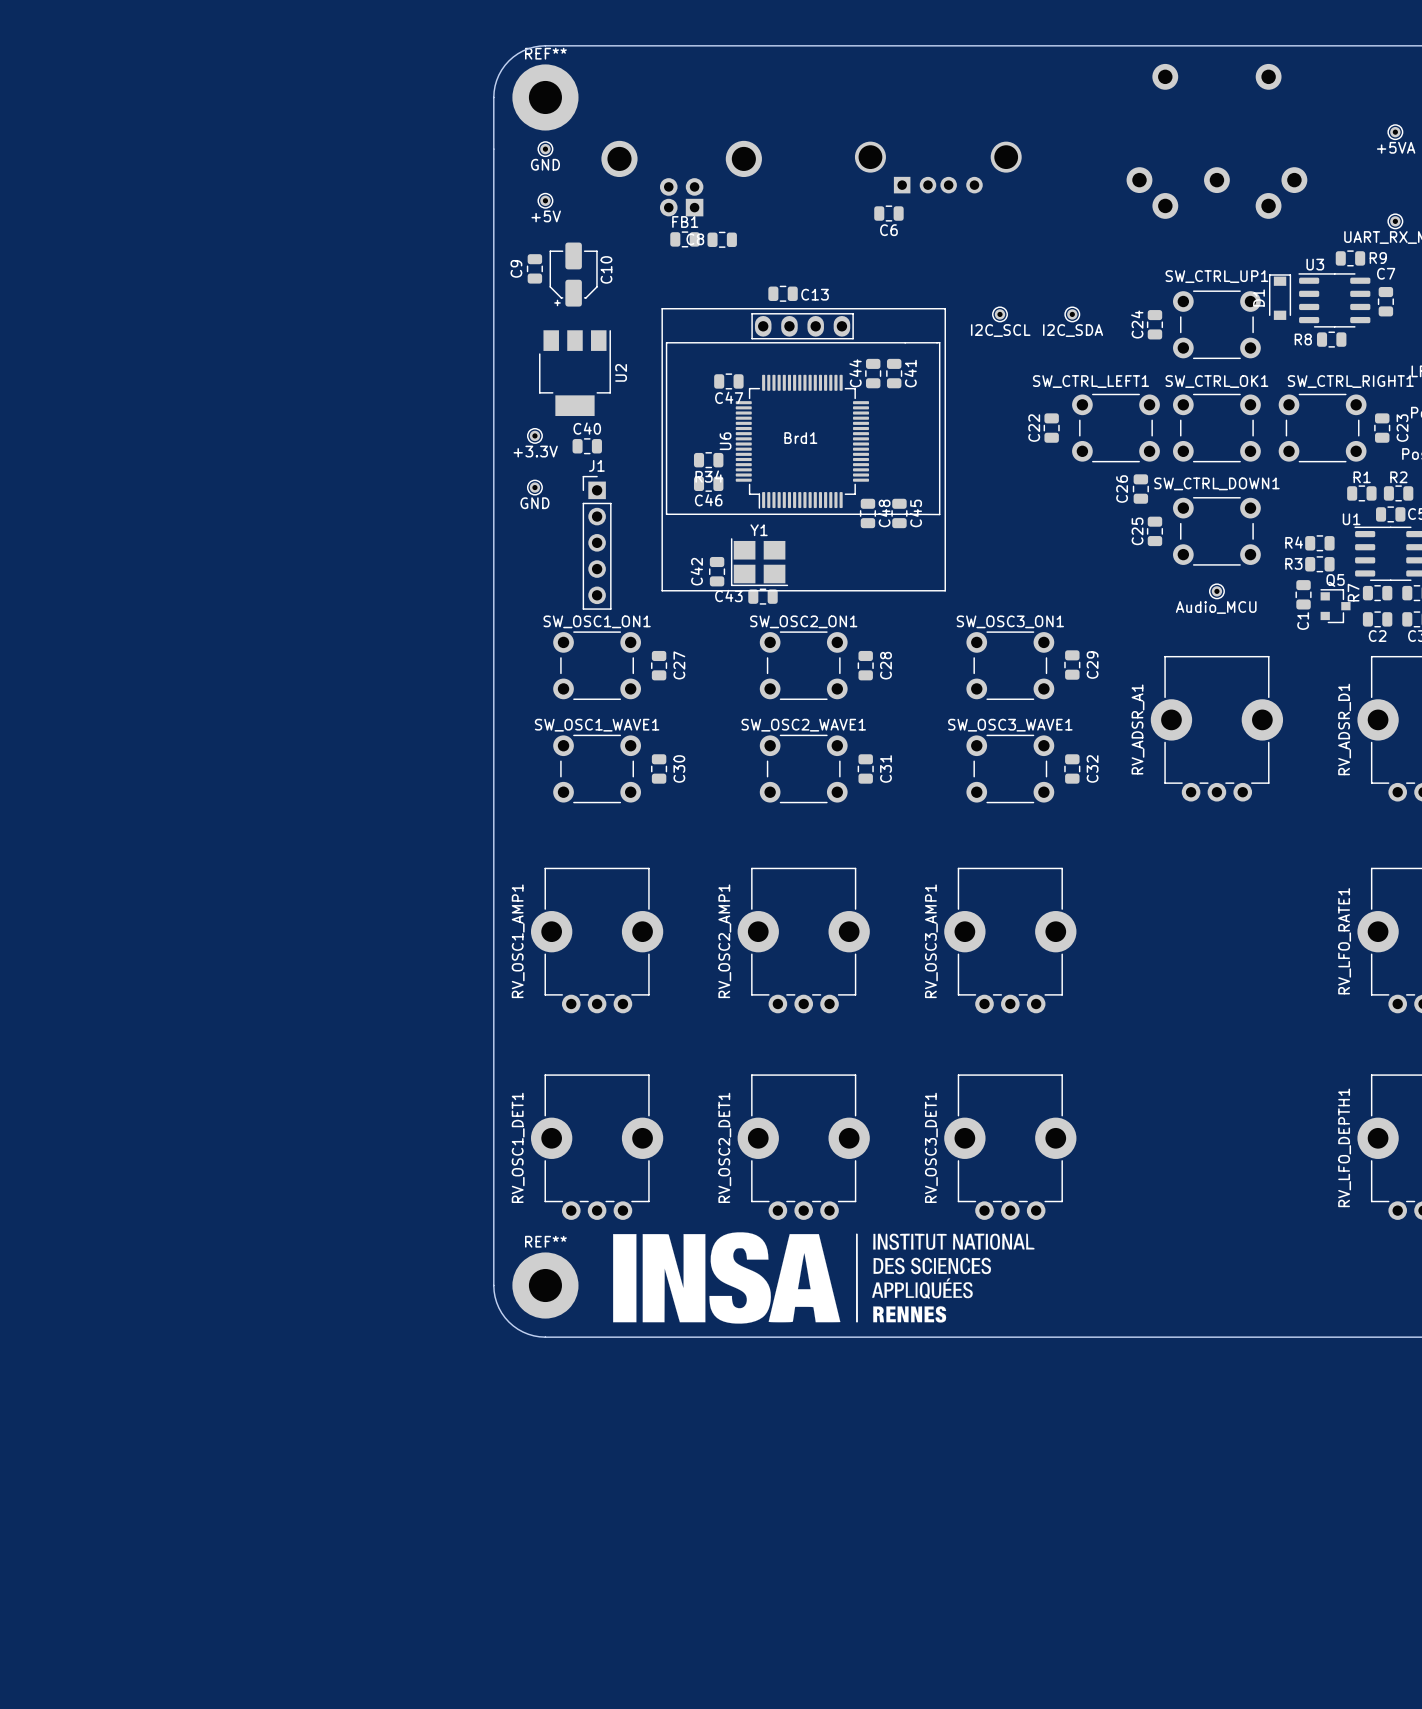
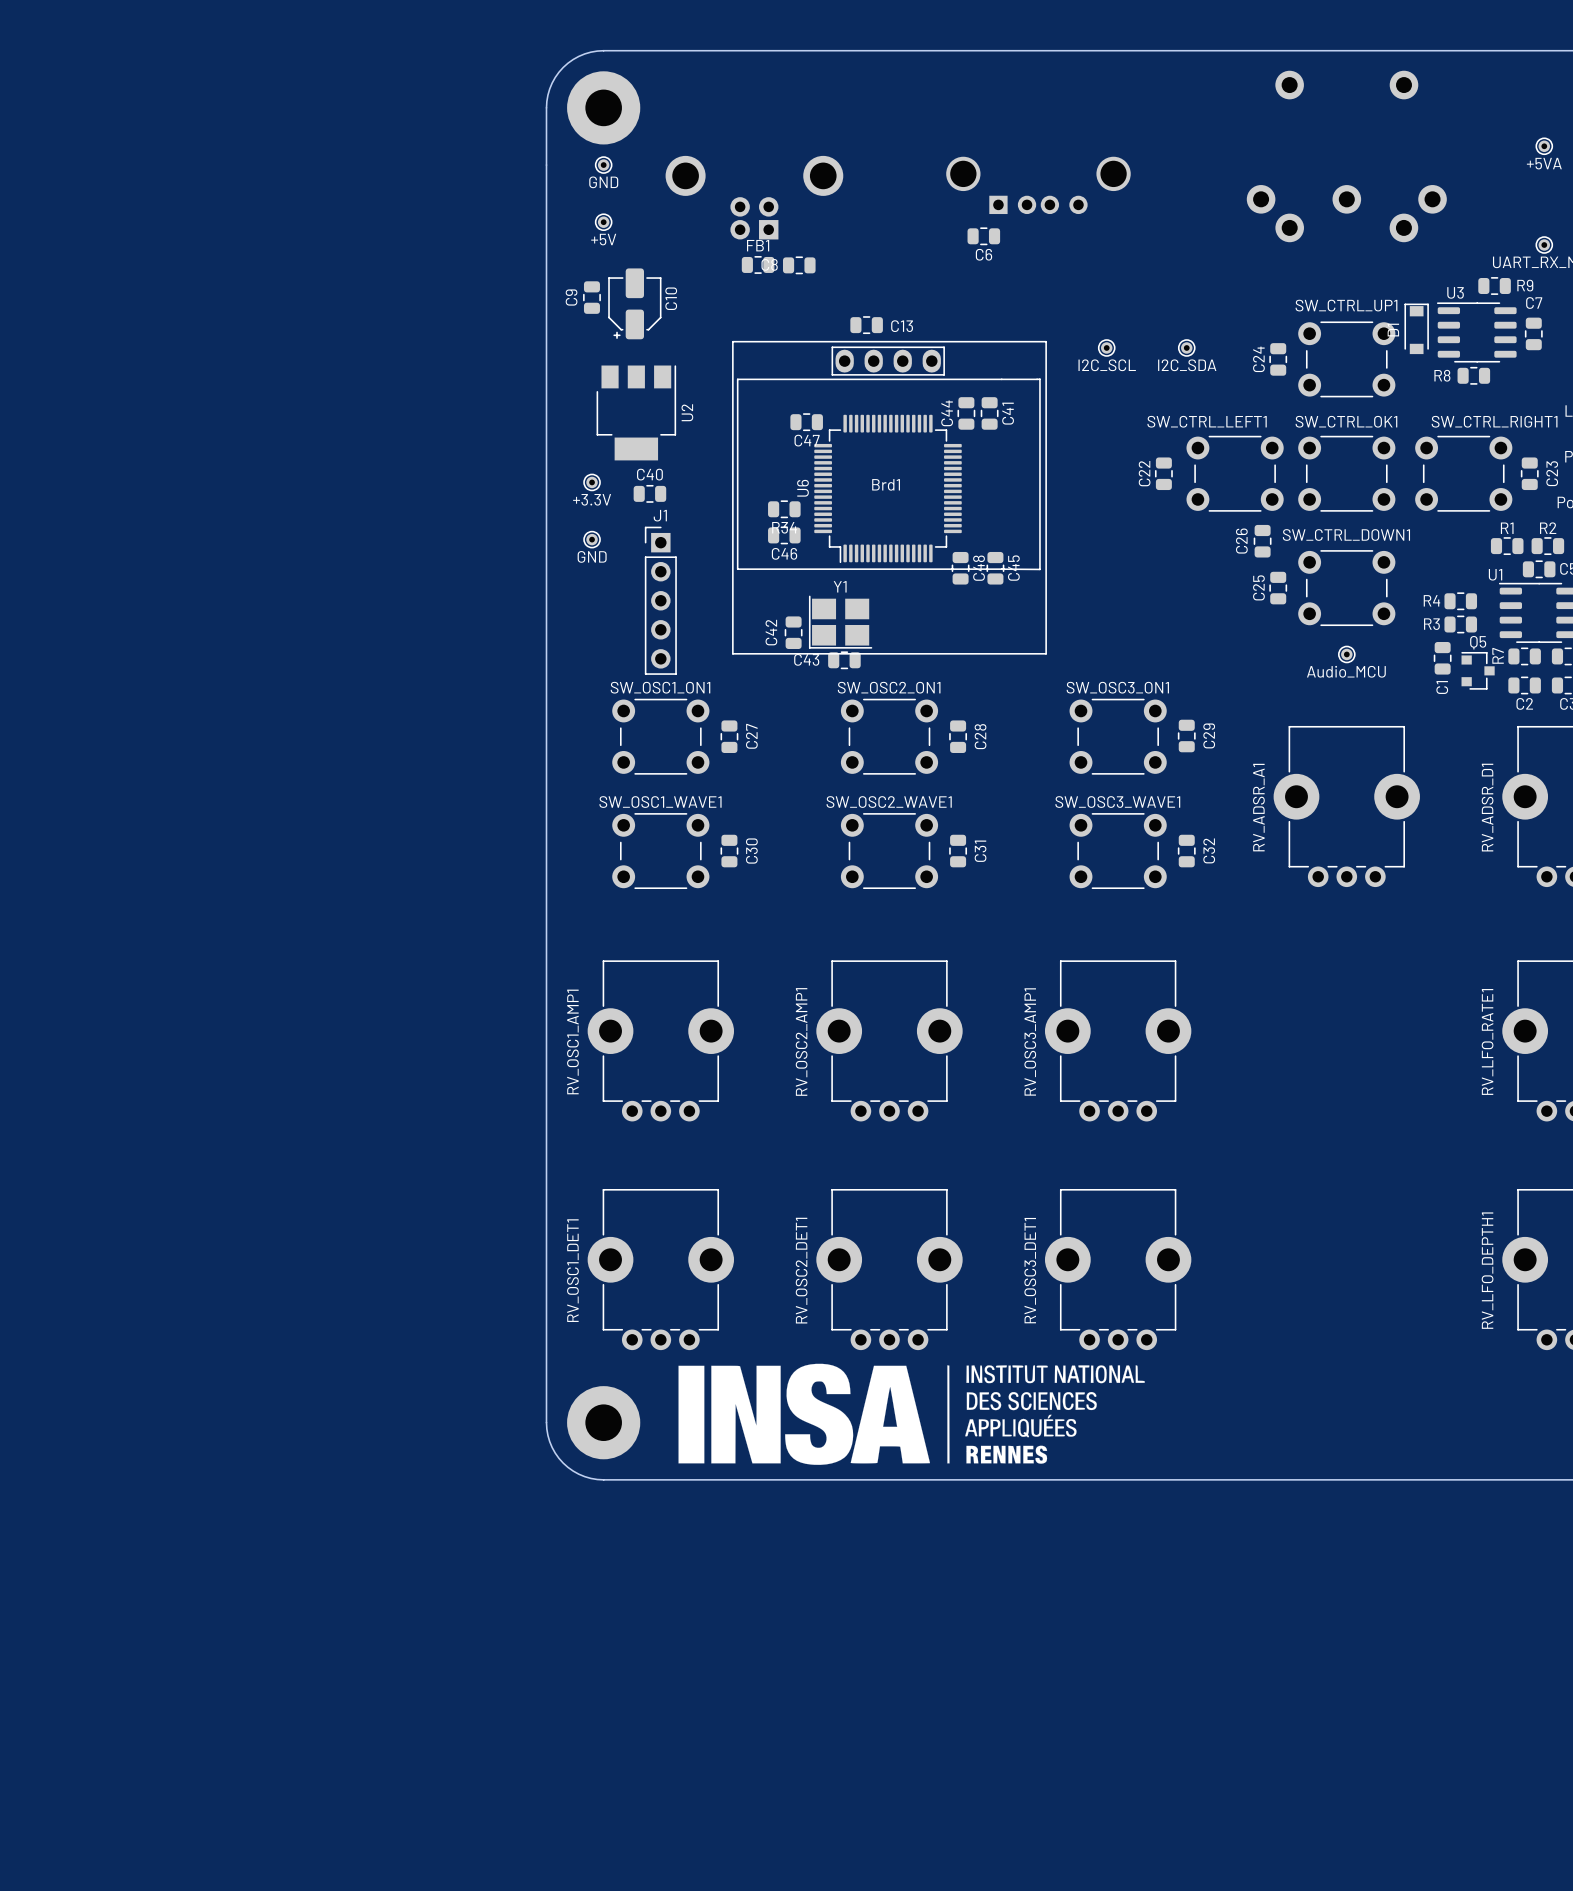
REF** name: REF** (545, 53) -> none
REF** name: REF** (545, 1241) -> none

